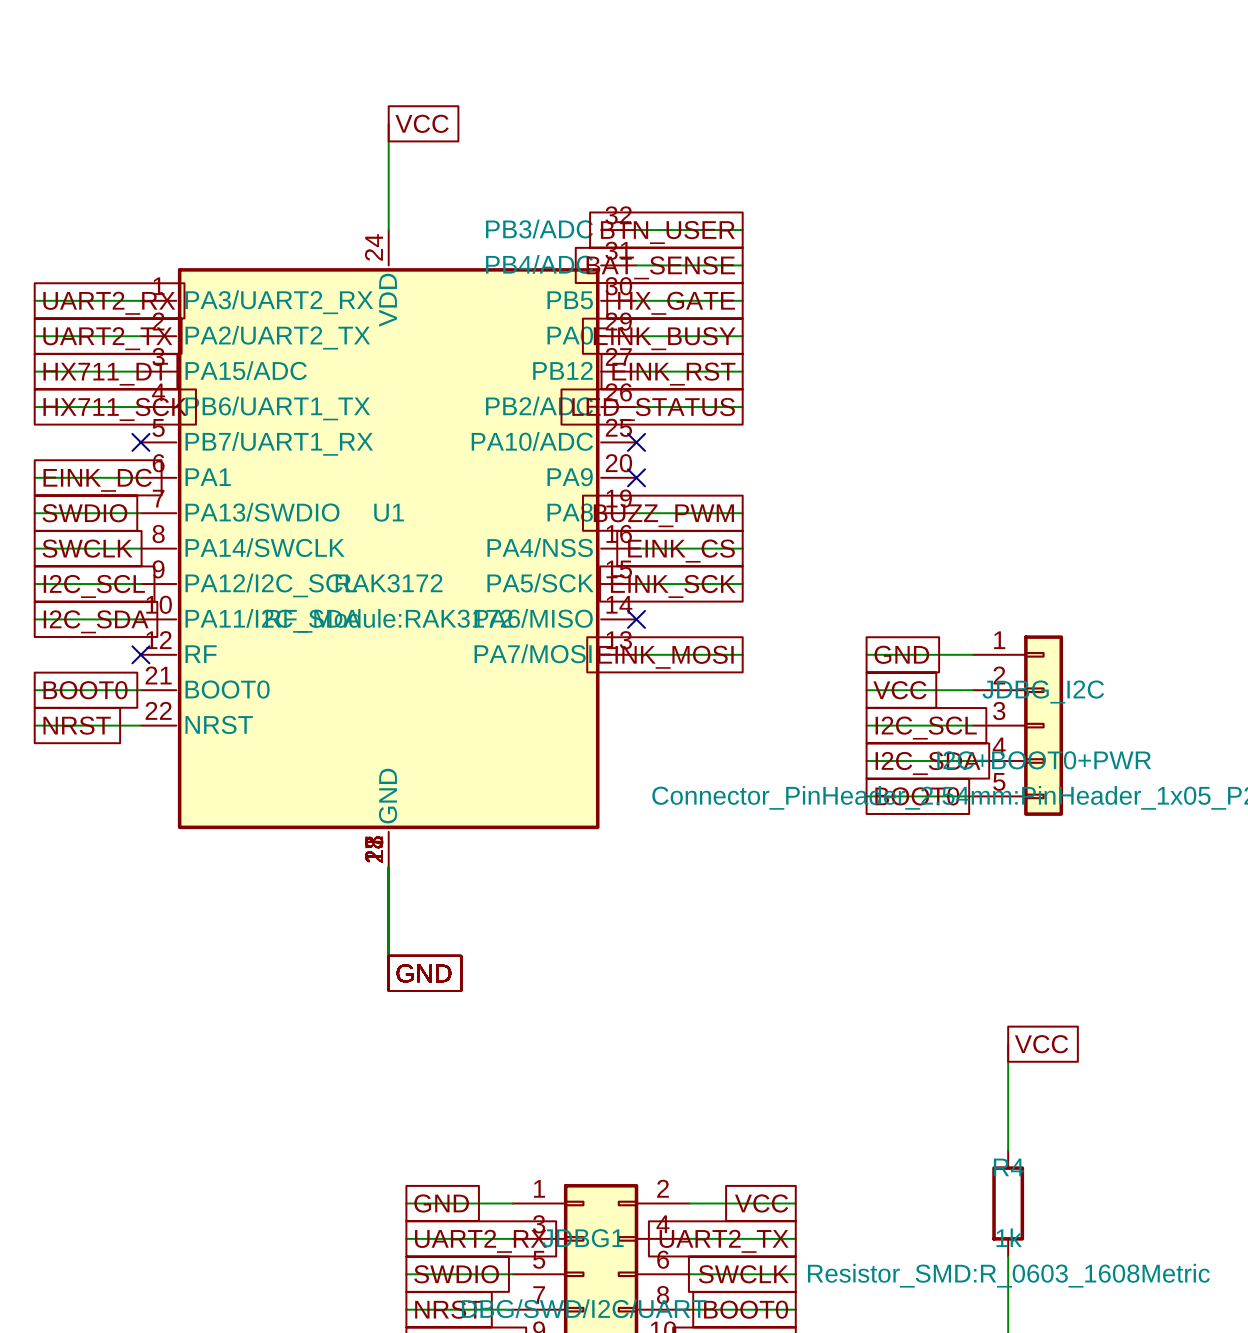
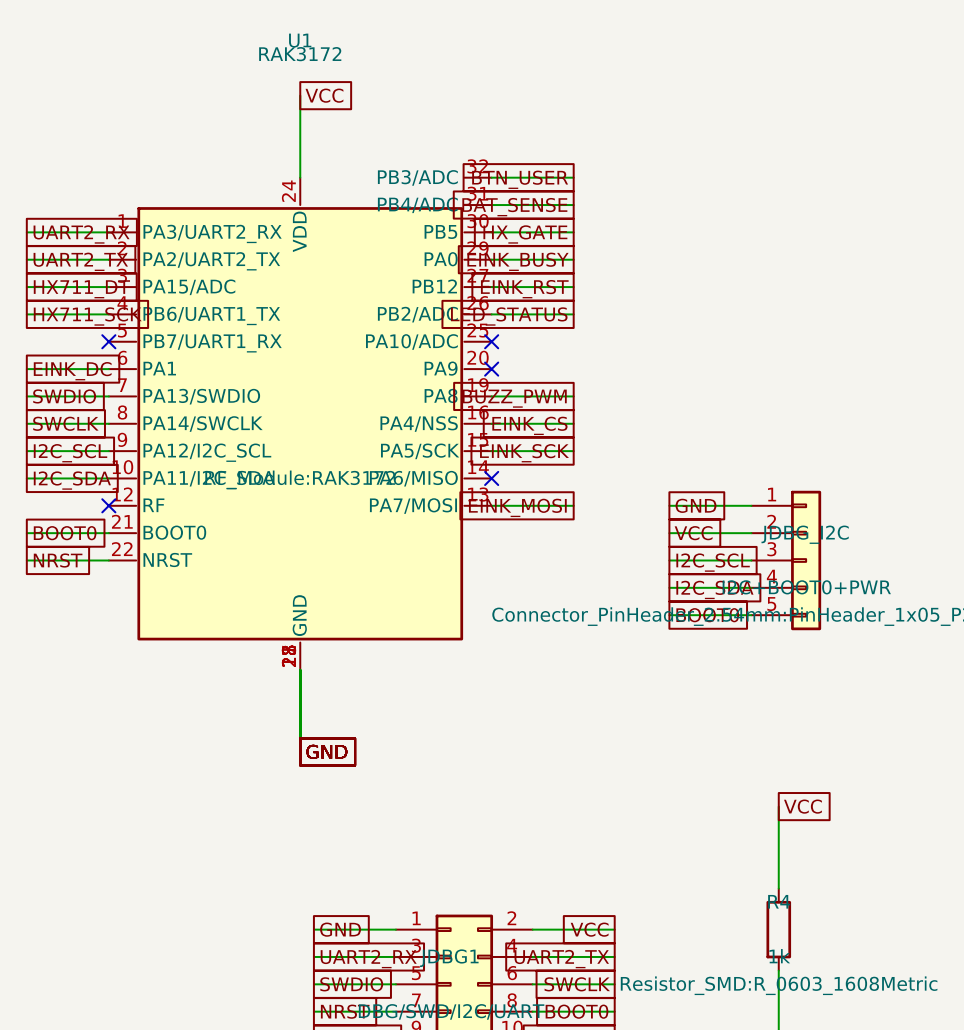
U1 name position: U1 (389, 512) -> U1 (300, 40)
U1 value position: RAK3172 (389, 583) -> RAK3172 (300, 54)

